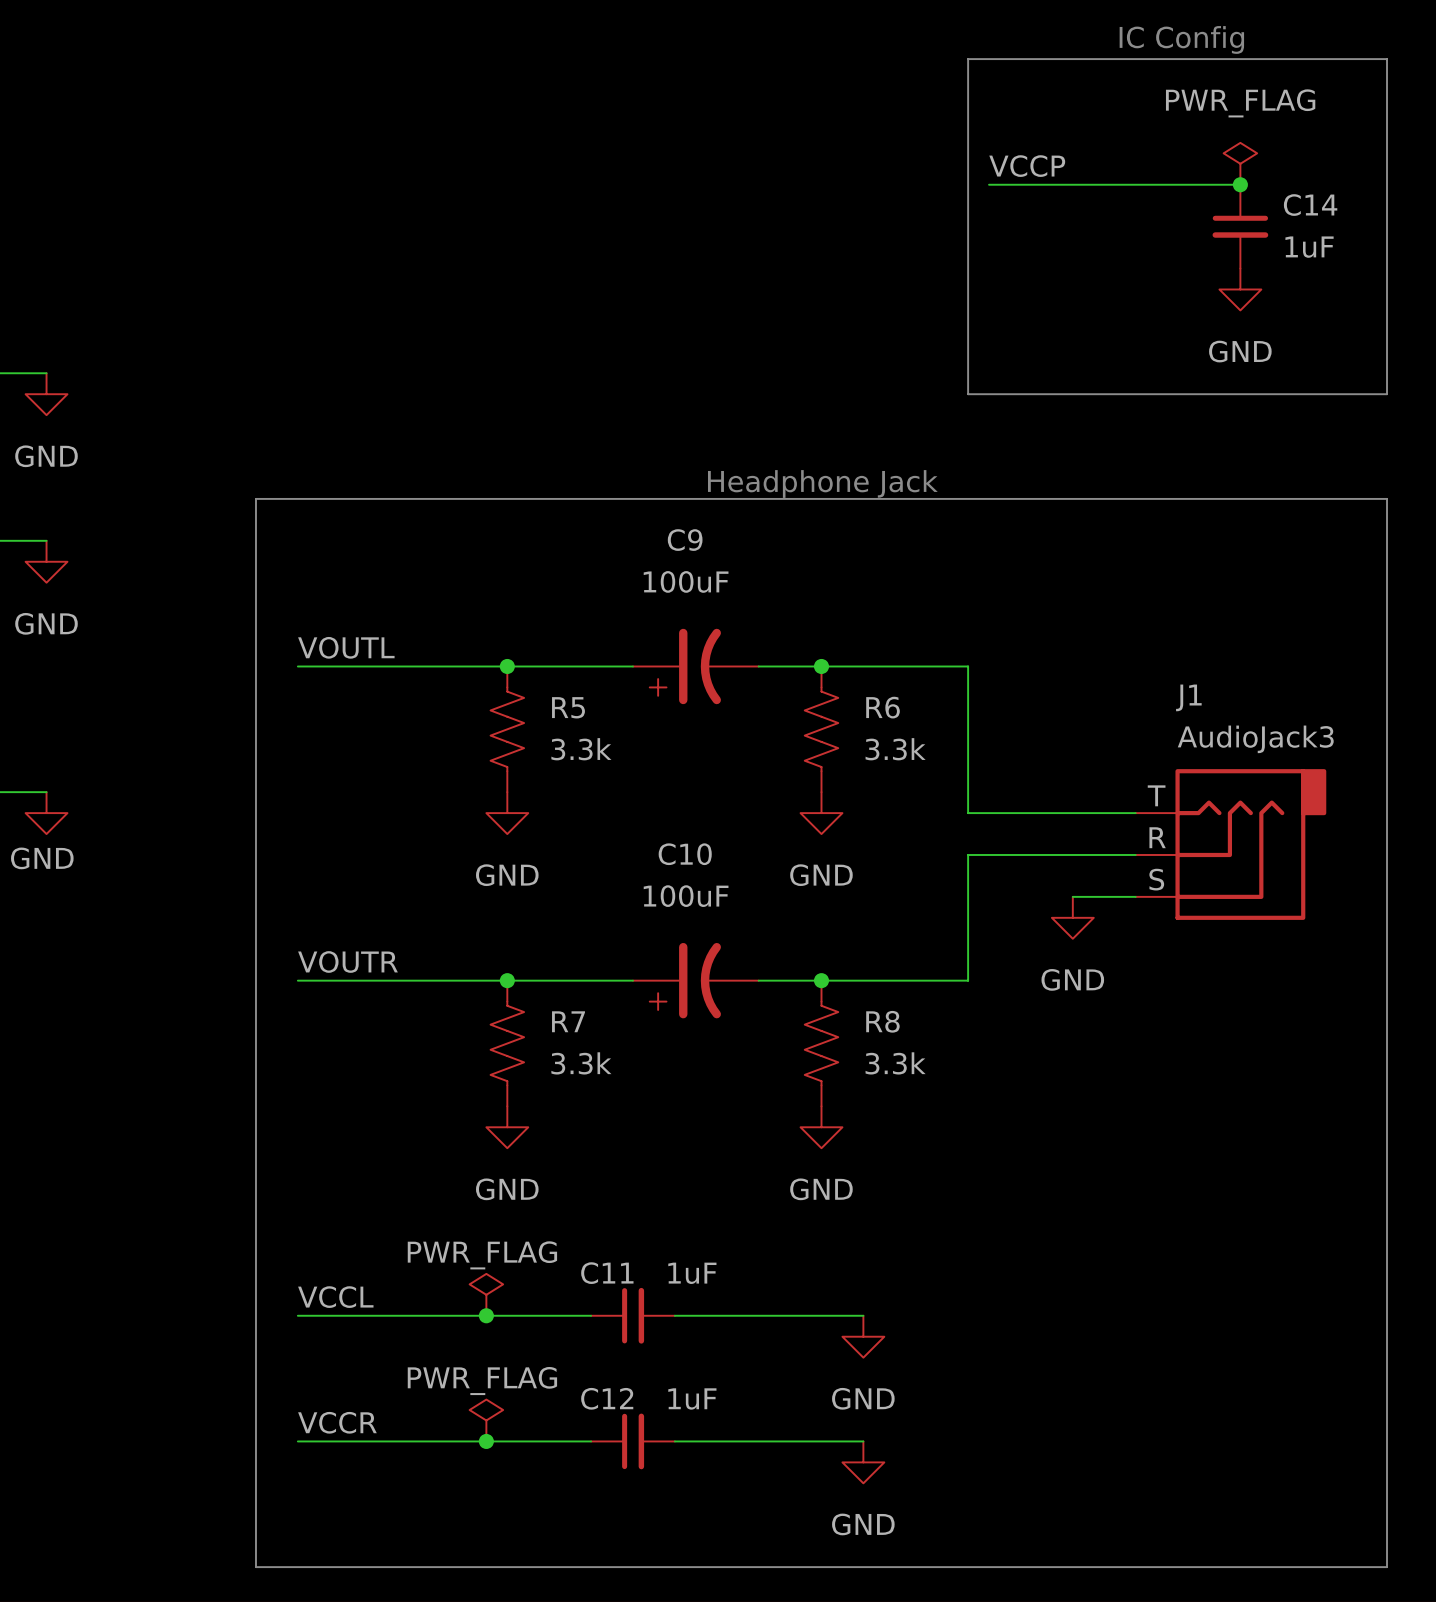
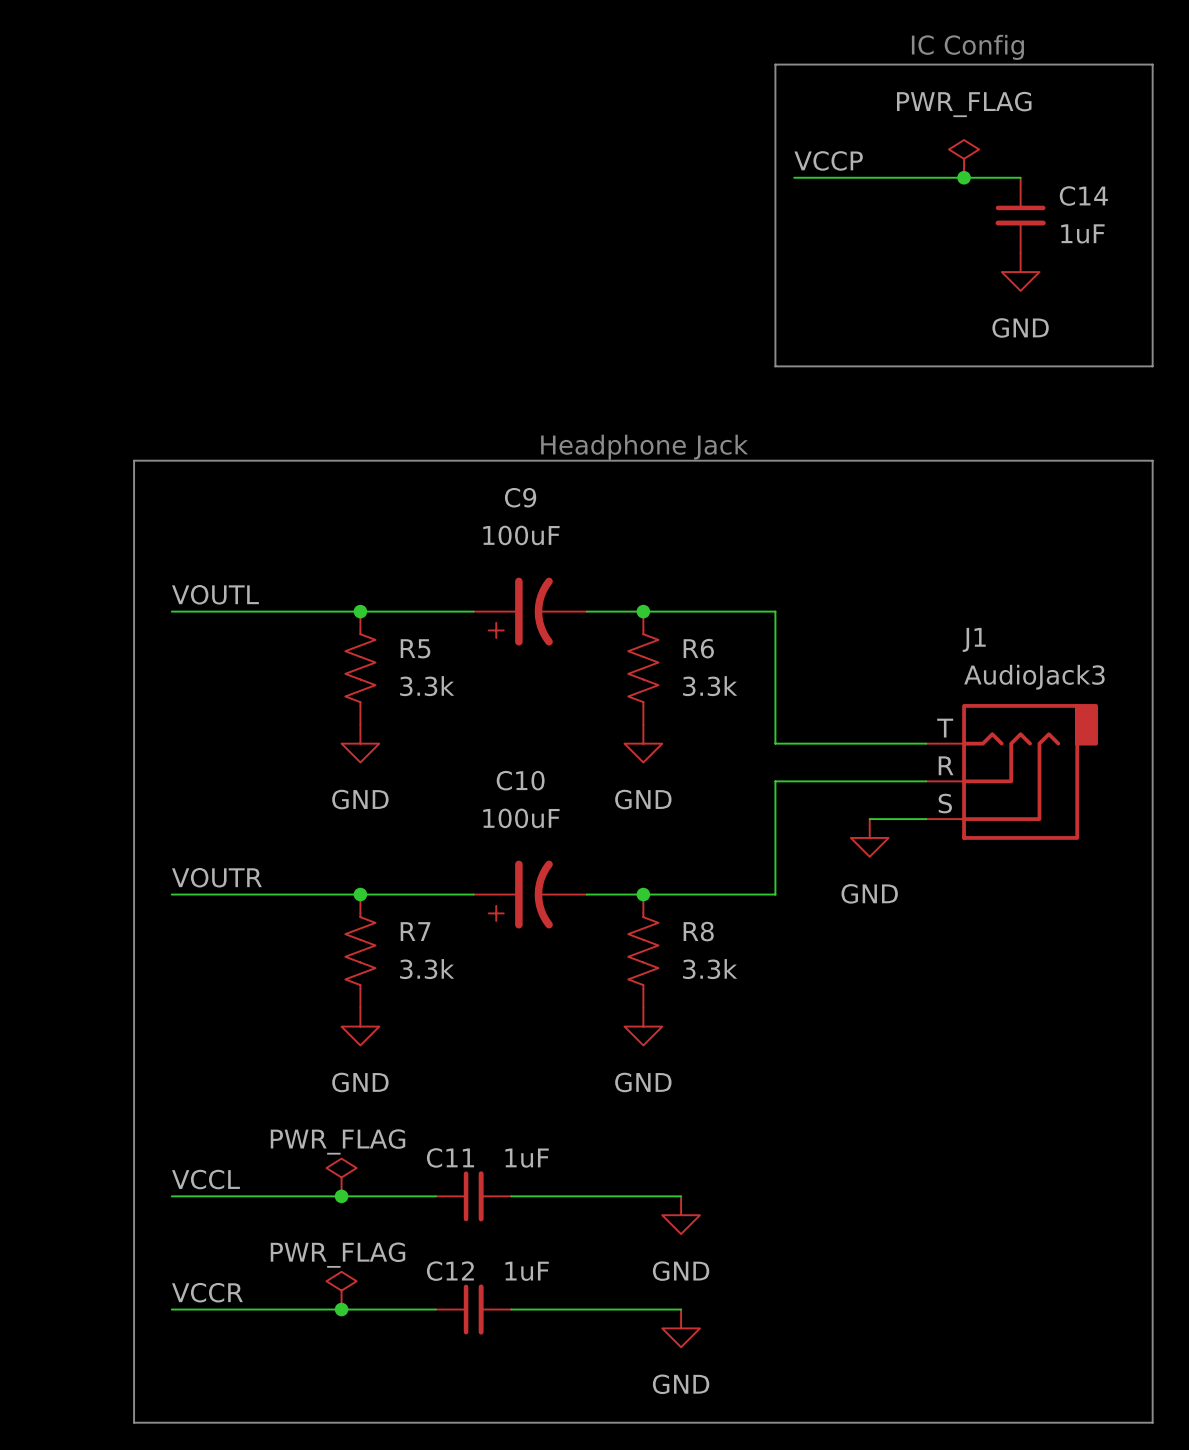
power symbol position: PWR_FLAG (1240, 163) -> PWR_FLAG (964, 158)
junction position: (1240, 184) -> (964, 177)

